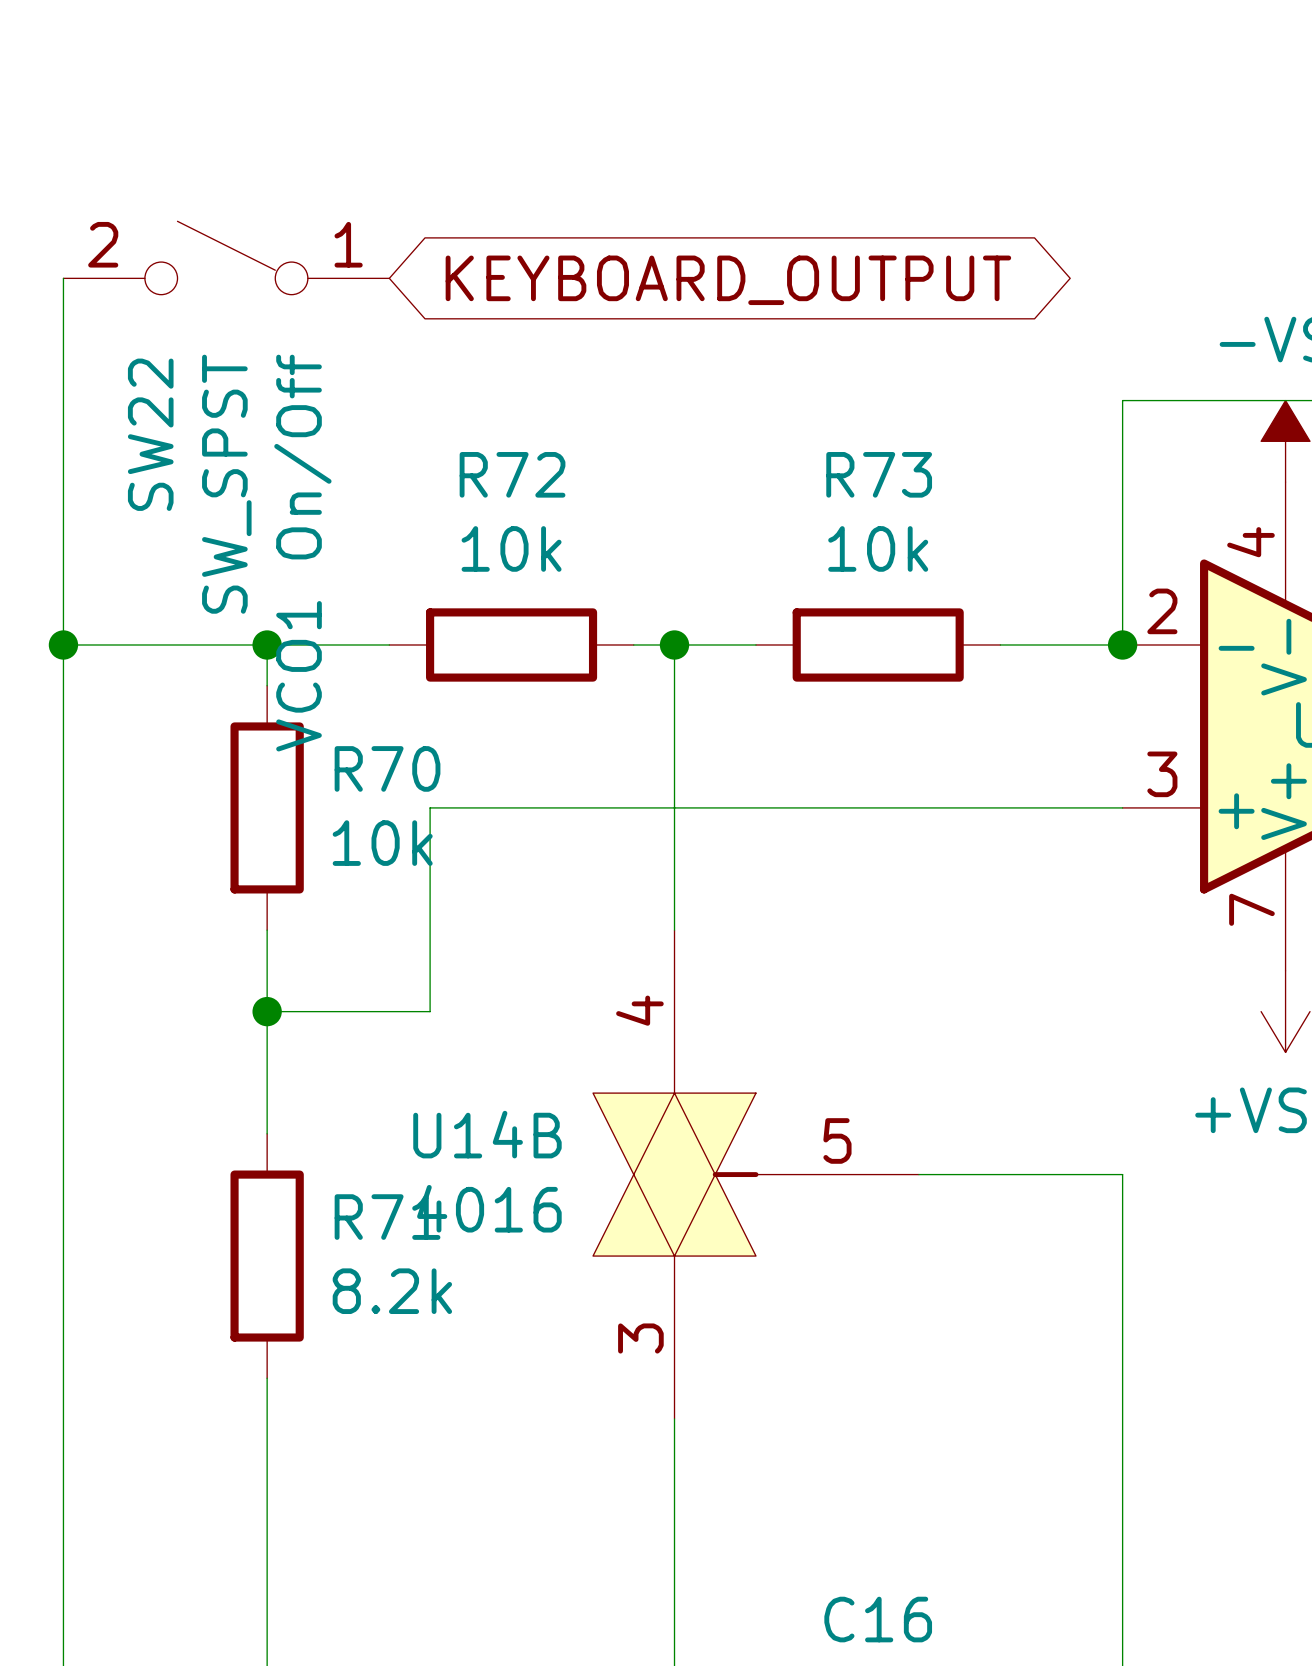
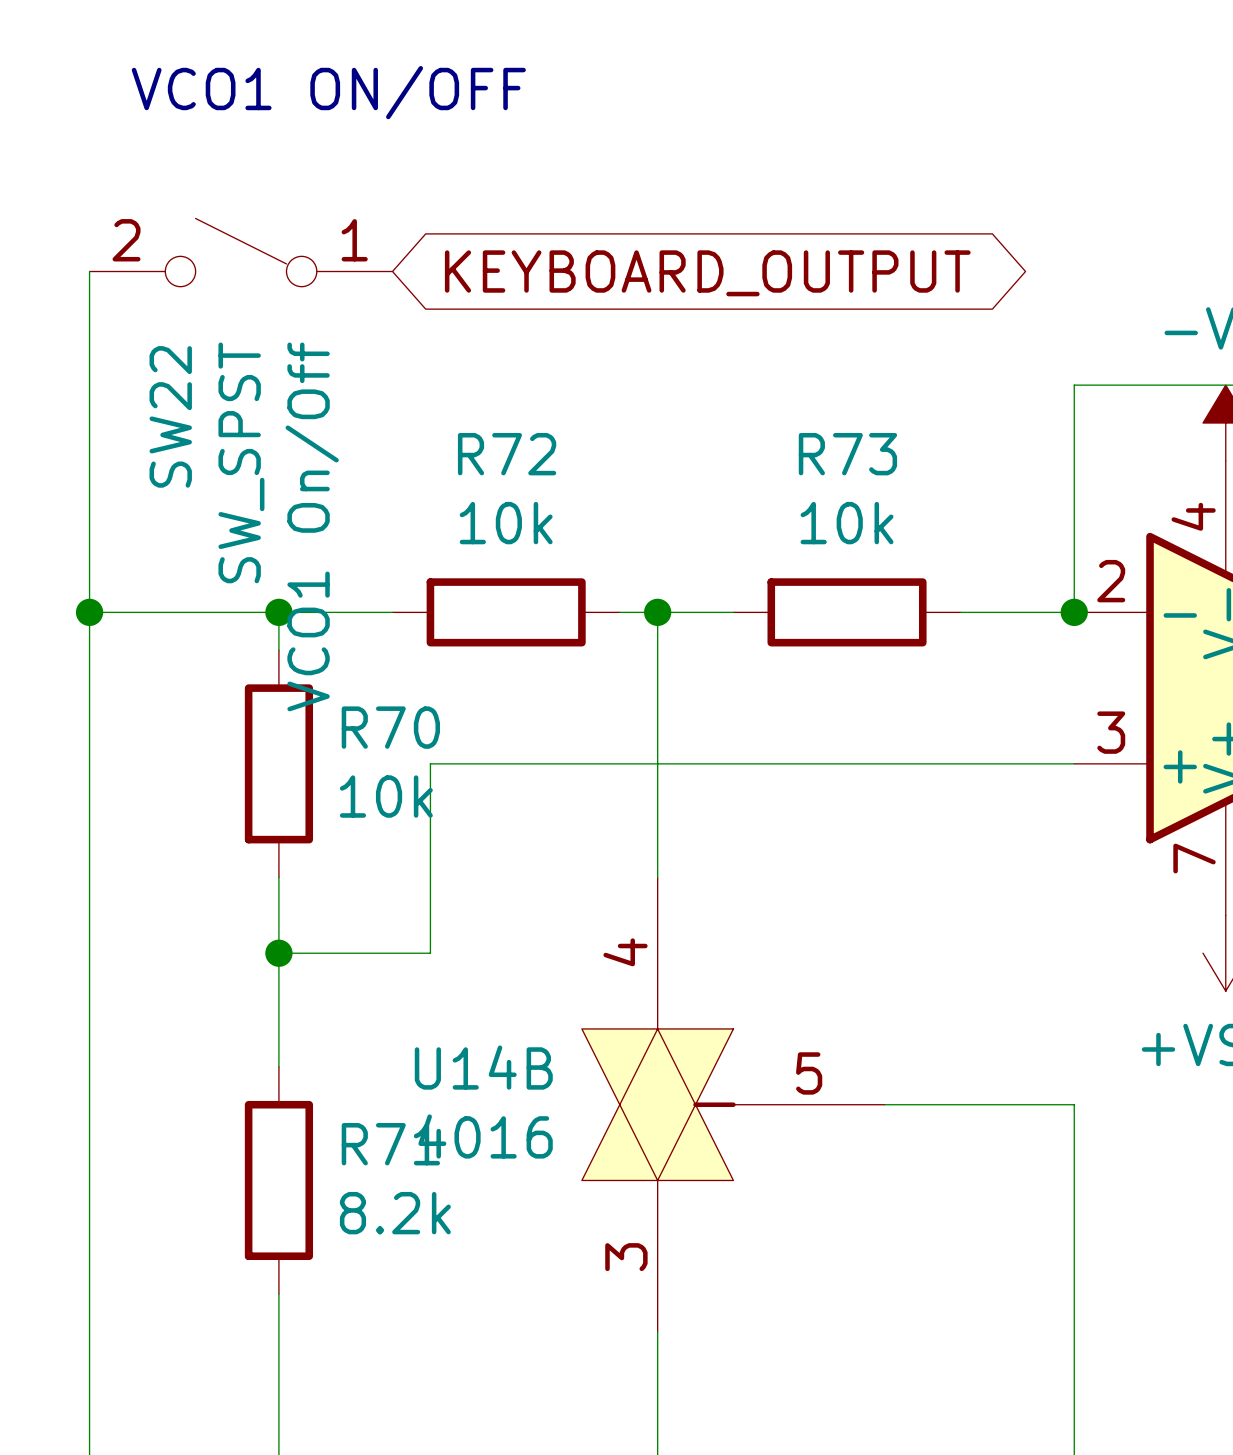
text: none -> VCO1 ON/OFF (328, 92)

